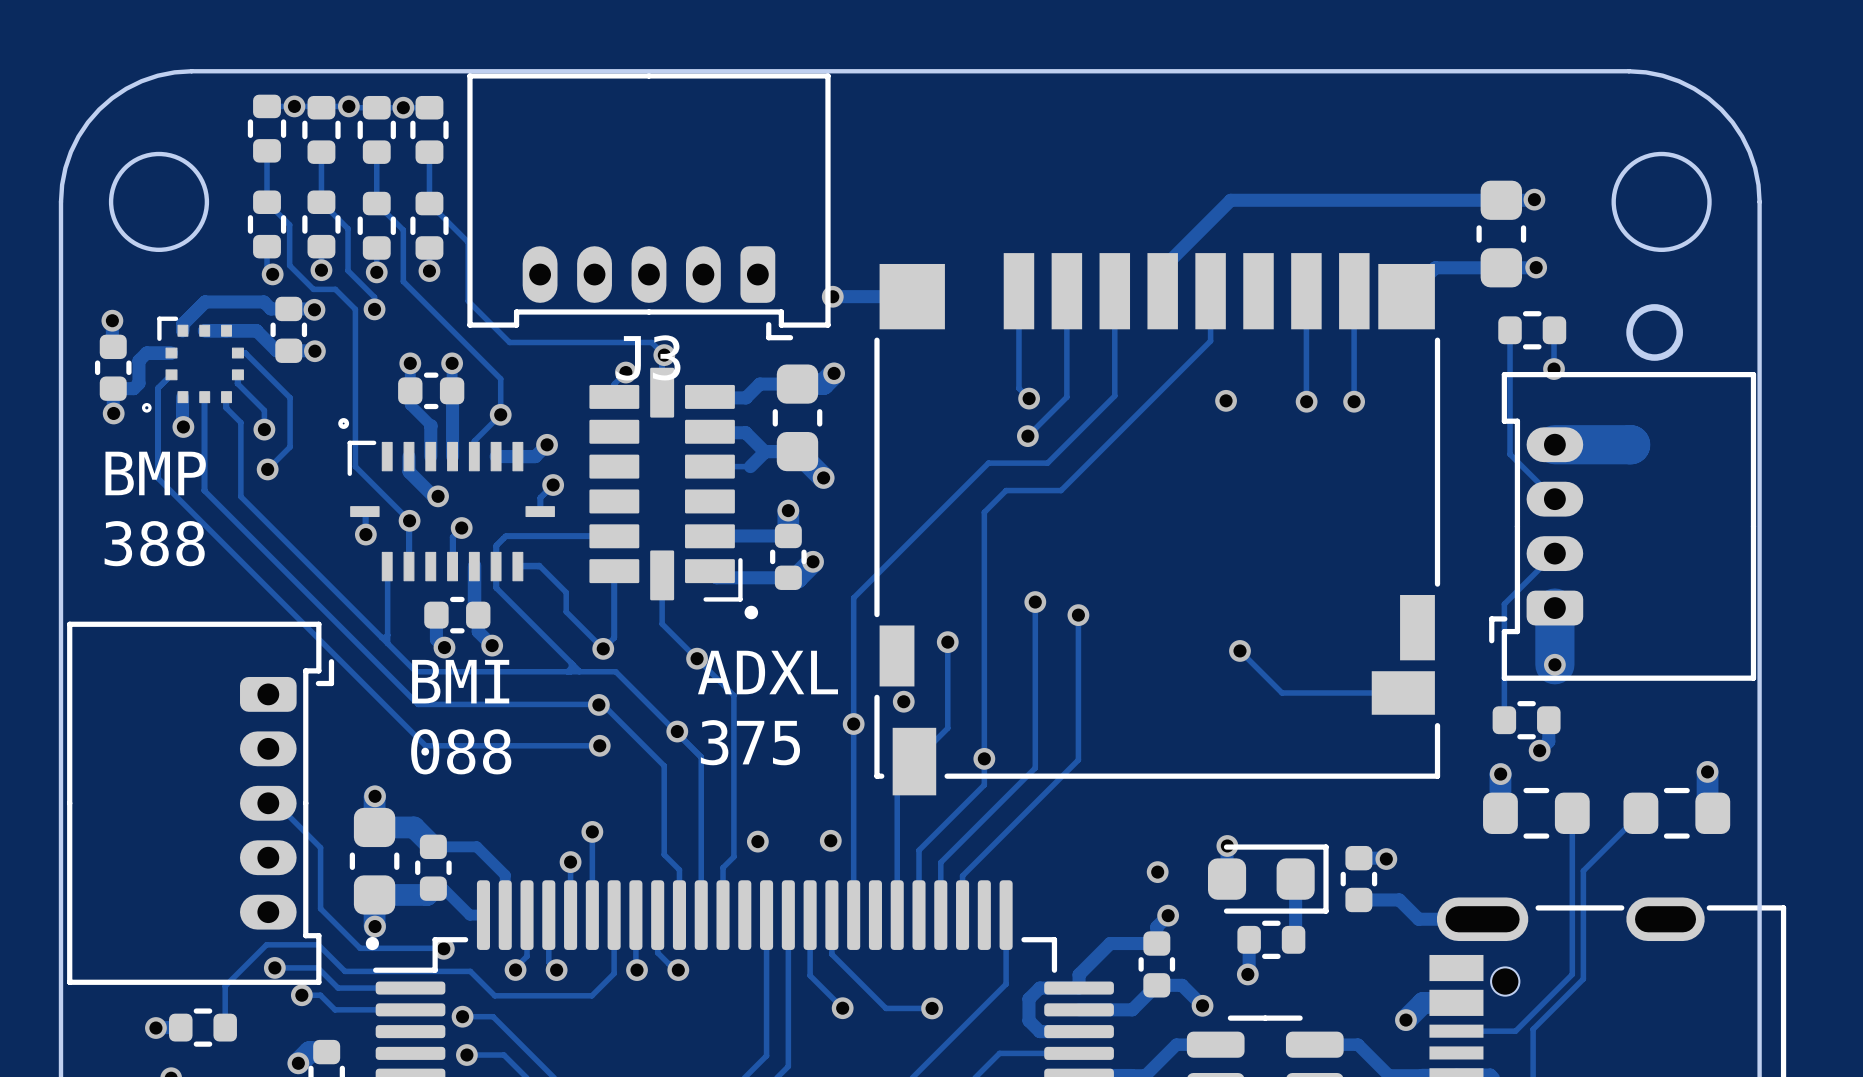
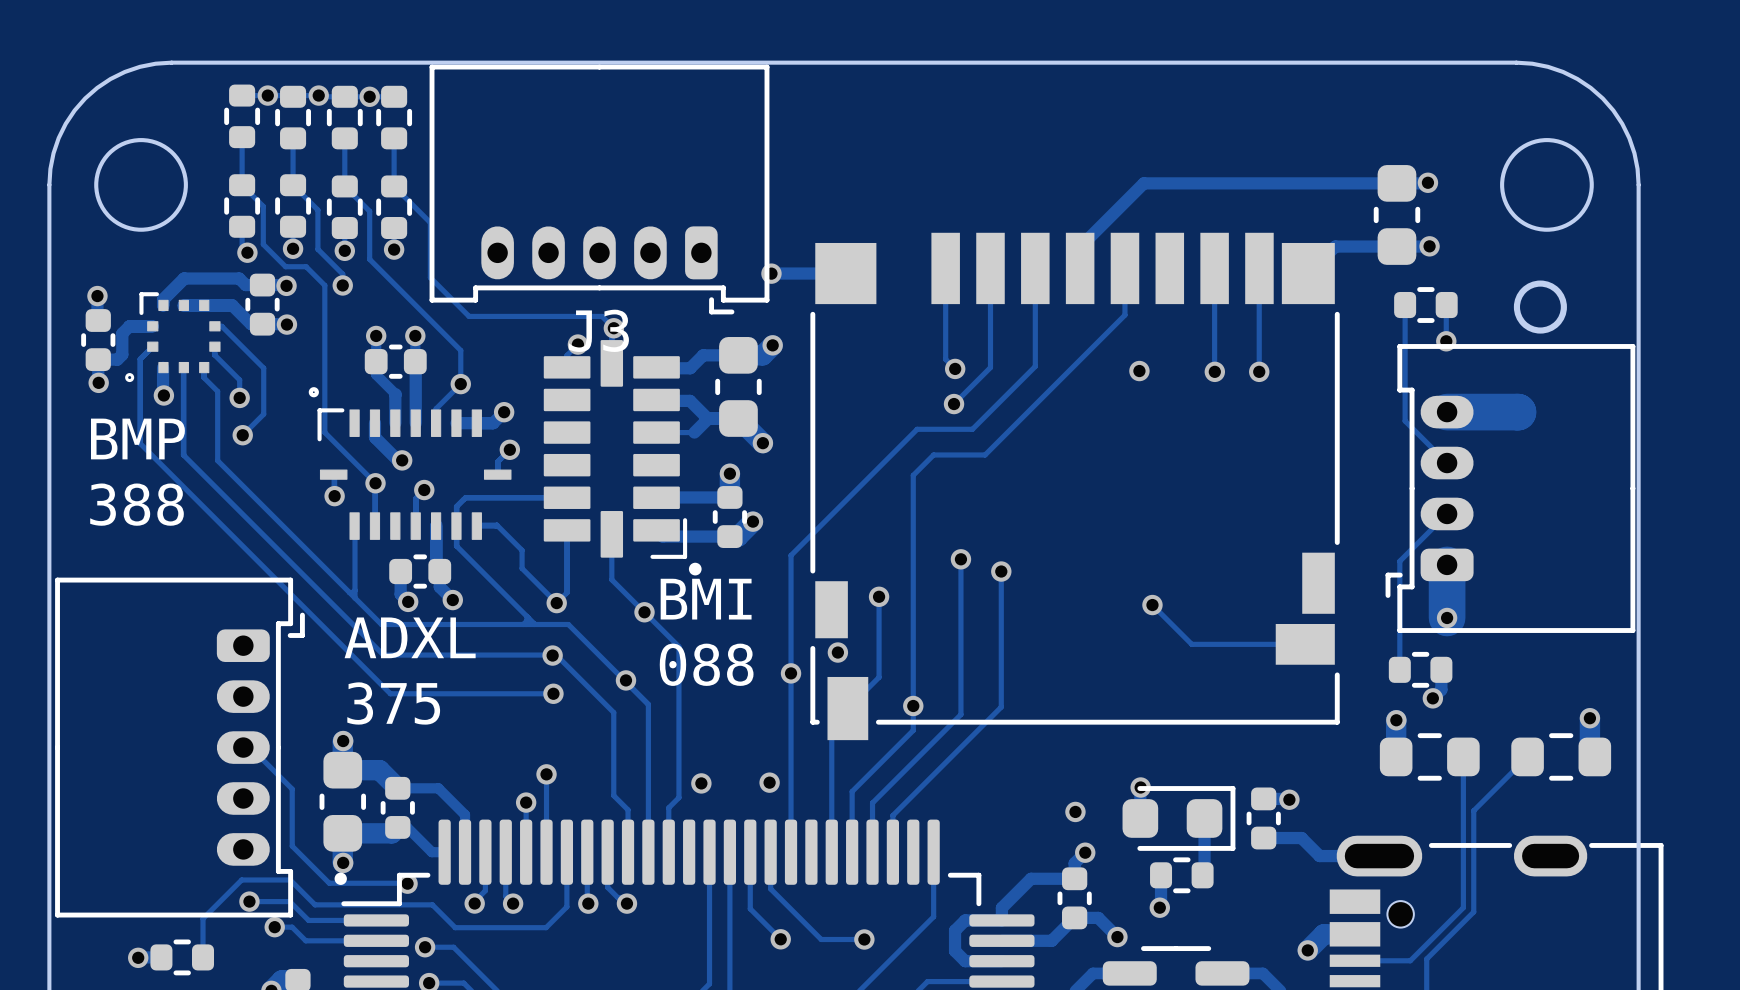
text: none -> BMI (706, 599)
text: ADXL (767, 672) -> none
text: BMI (460, 681) -> ADXL (410, 637)
text: none -> 088 (706, 664)
text: 375 (750, 742) -> none
text: 088 (461, 751) -> 375 (393, 703)

